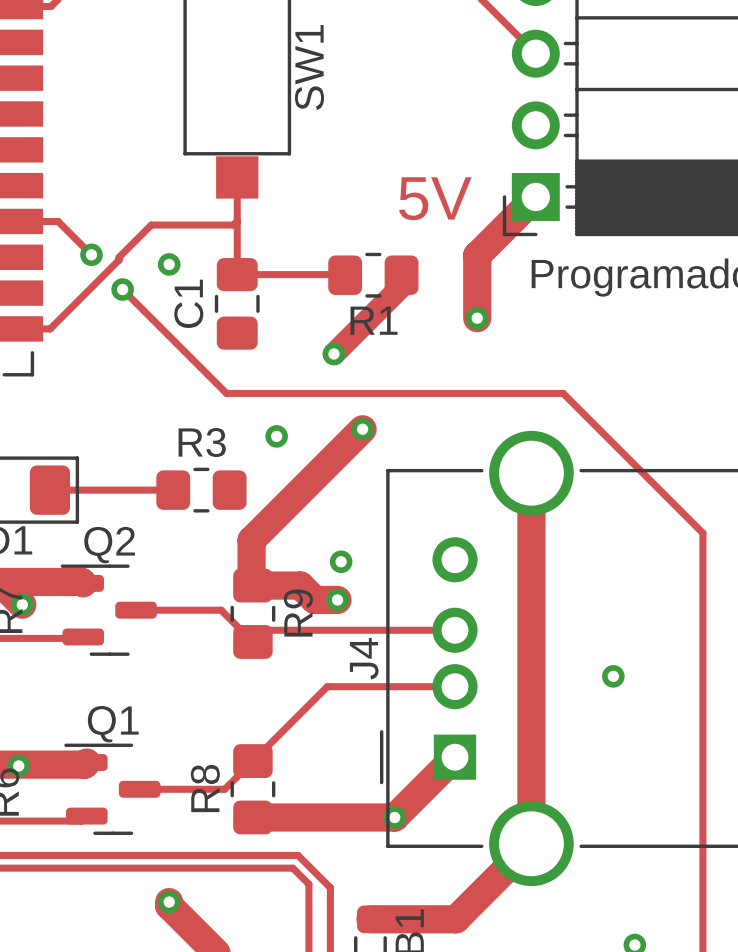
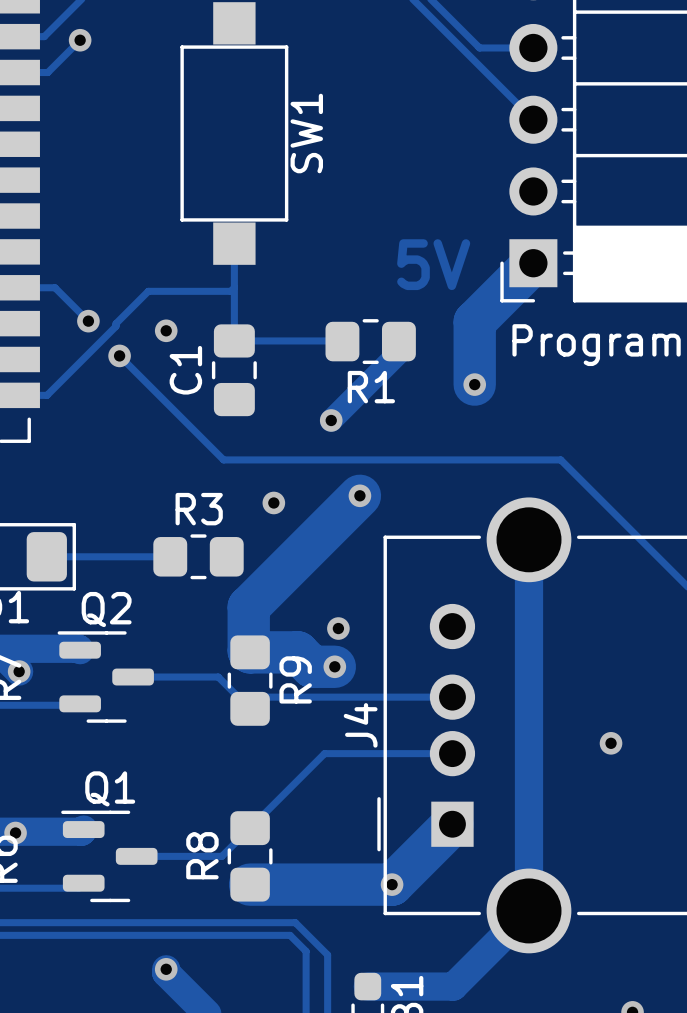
track width: thin (535, 196) (477, 255) (477, 318) -> thick (533, 263) (474, 321) (474, 384)
track width: thin (362, 429) (251, 540) (252, 585) (300, 585) (314, 599) (337, 599) -> thick (359, 495) (248, 607) (250, 652) (297, 652) (312, 666) (334, 666)
track width: thin (455, 757) (394, 817) (252, 817) -> thick (452, 824) (392, 884) (250, 884)

